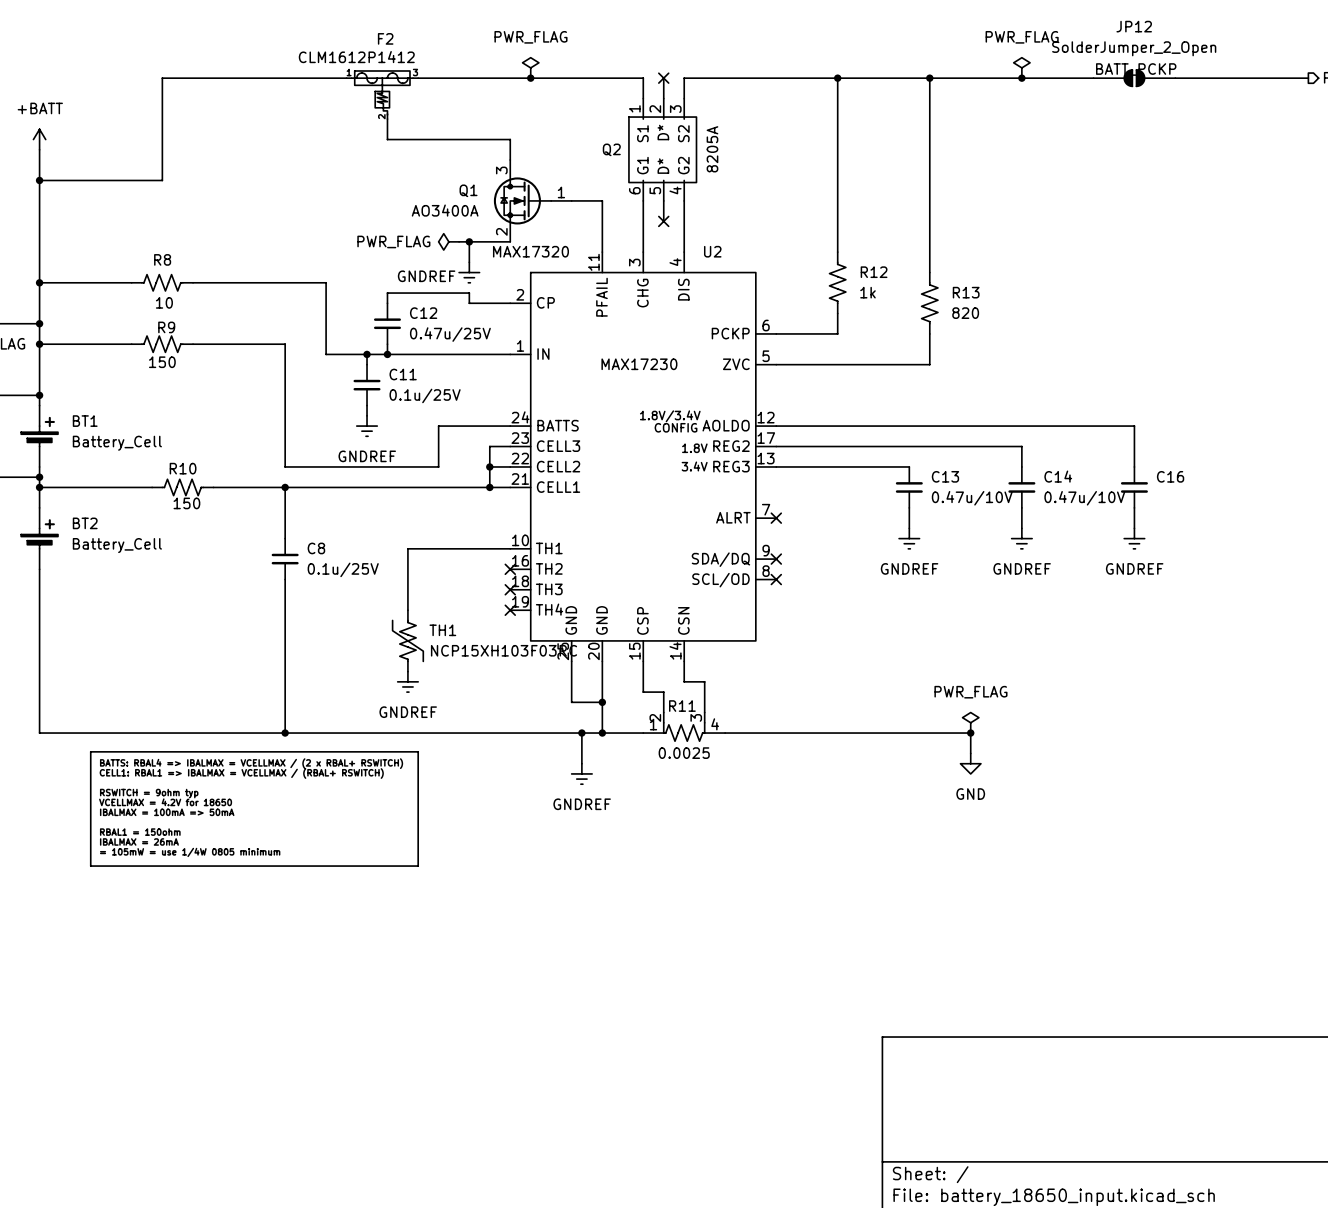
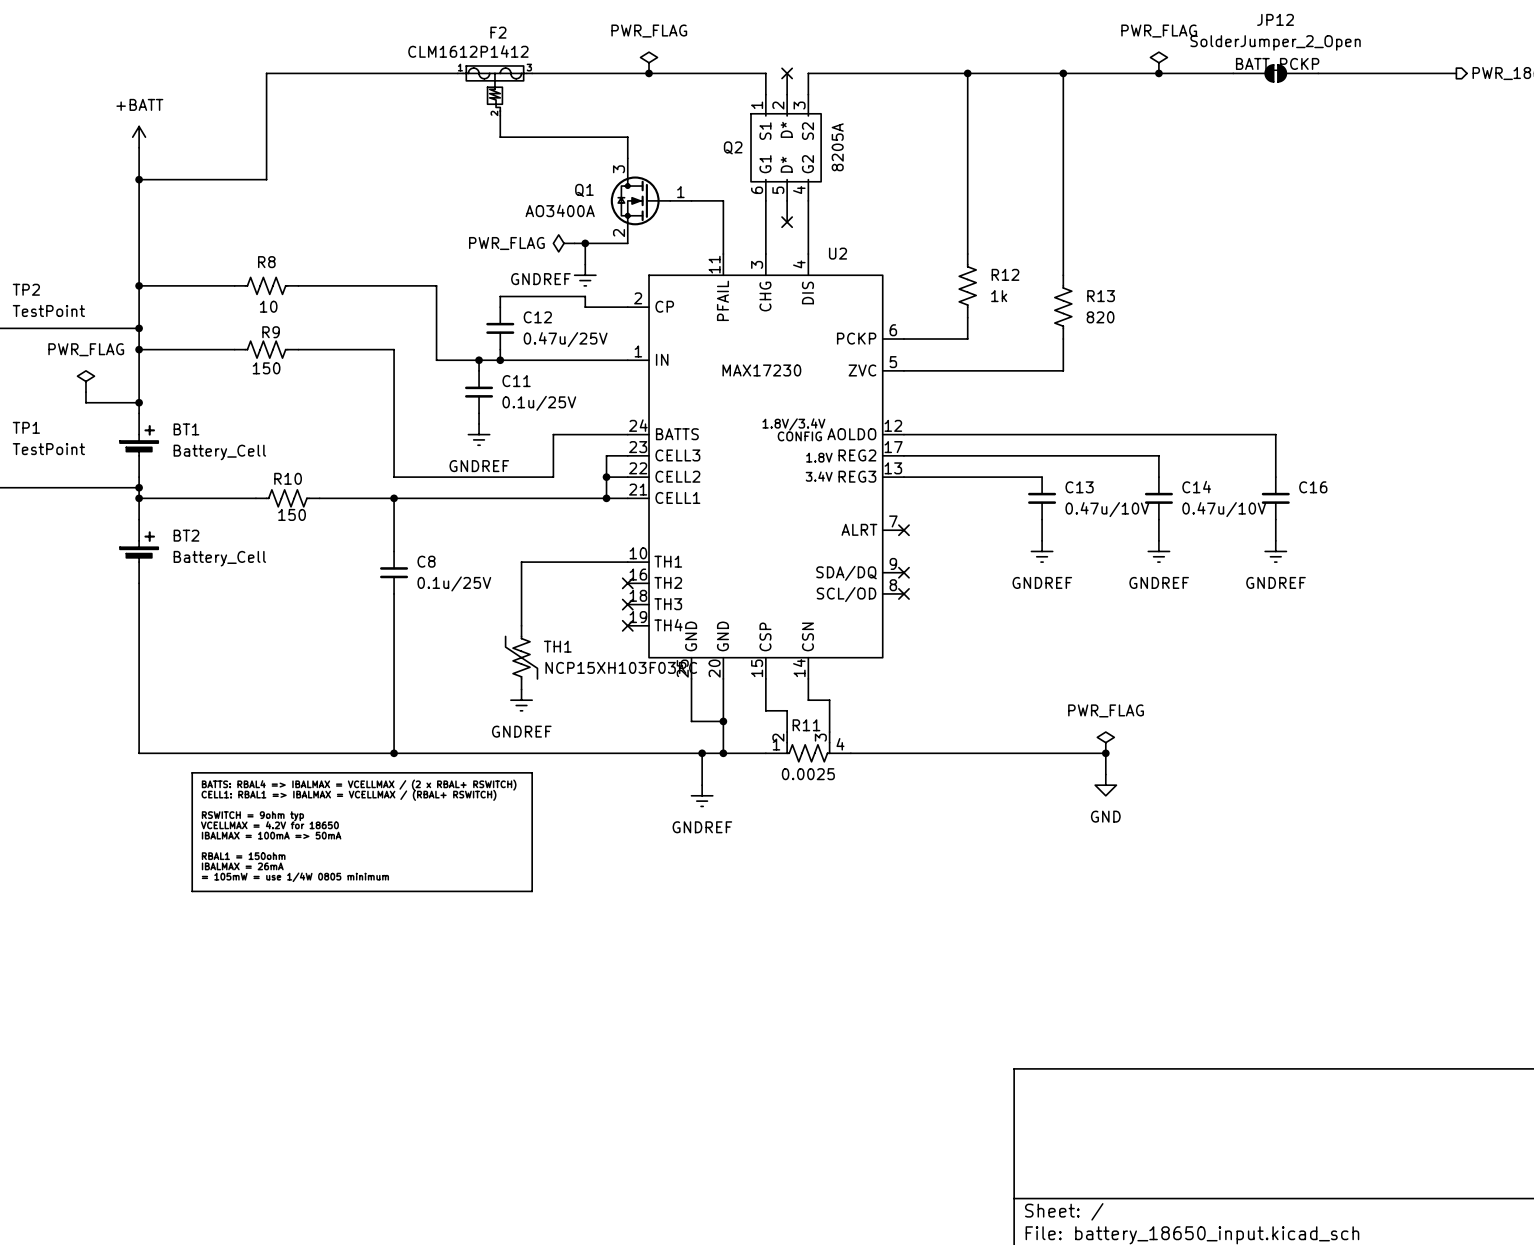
U2 value: MAX17320 (530, 251) -> none

